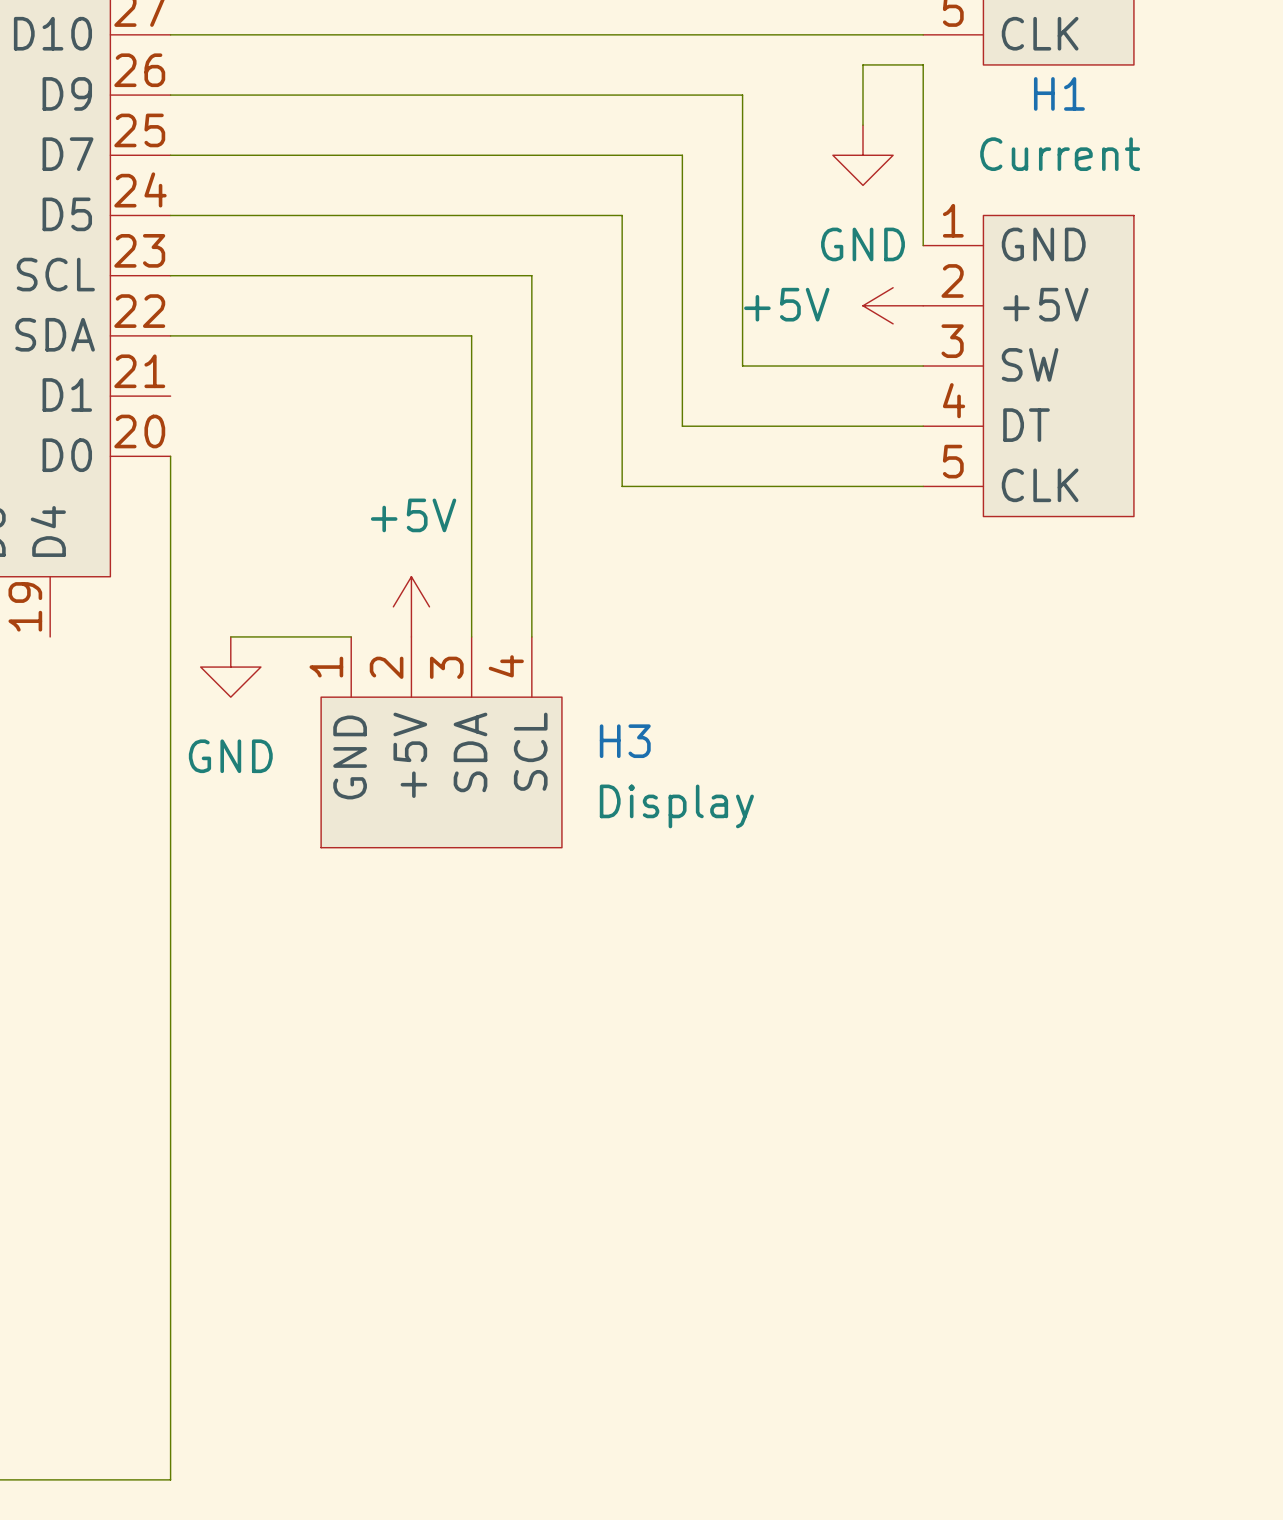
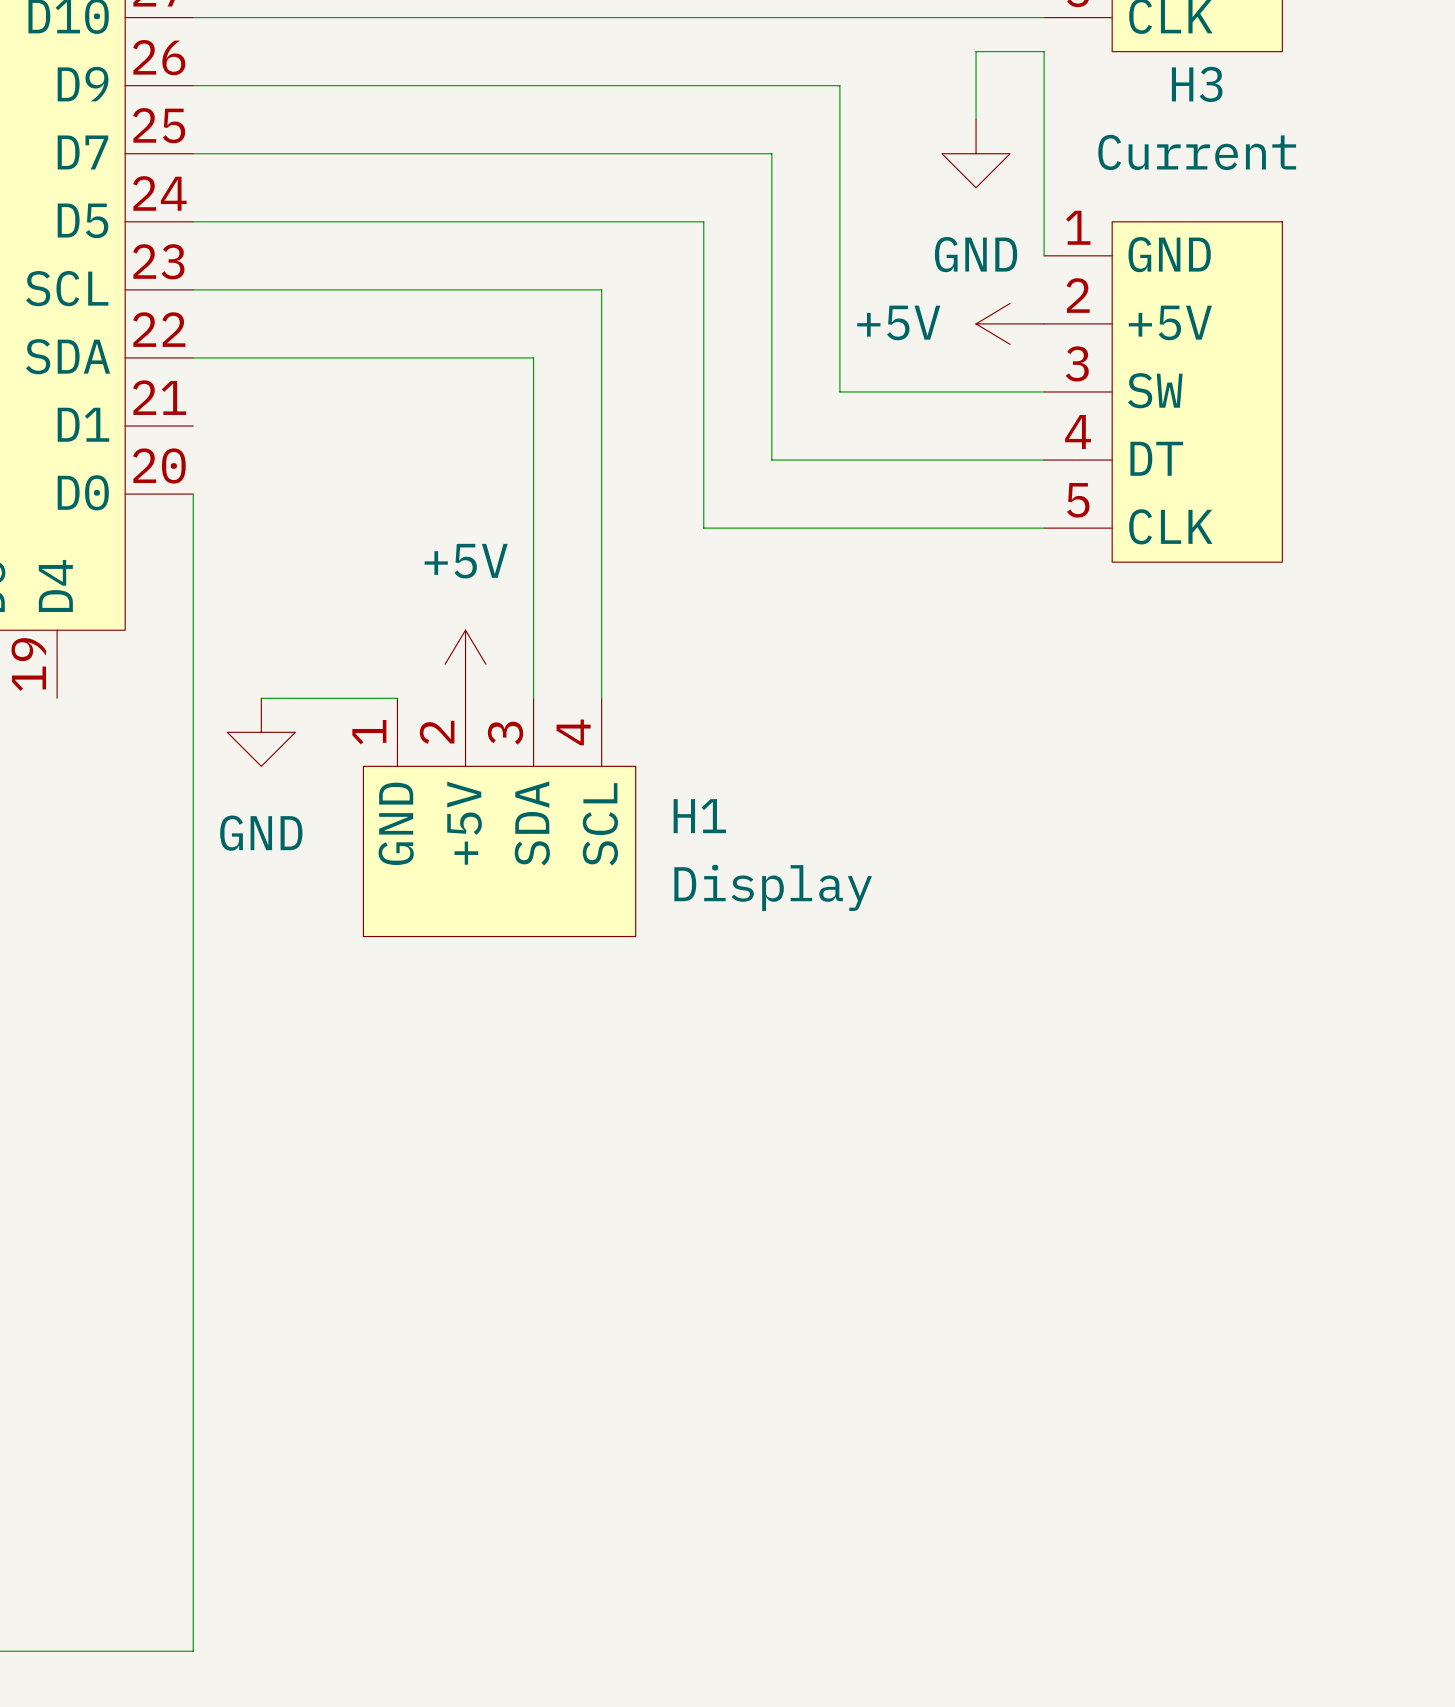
H1 name: H1 (1059, 93) -> H3 (1197, 84)
H3 name: H3 (625, 741) -> H1 (699, 816)

